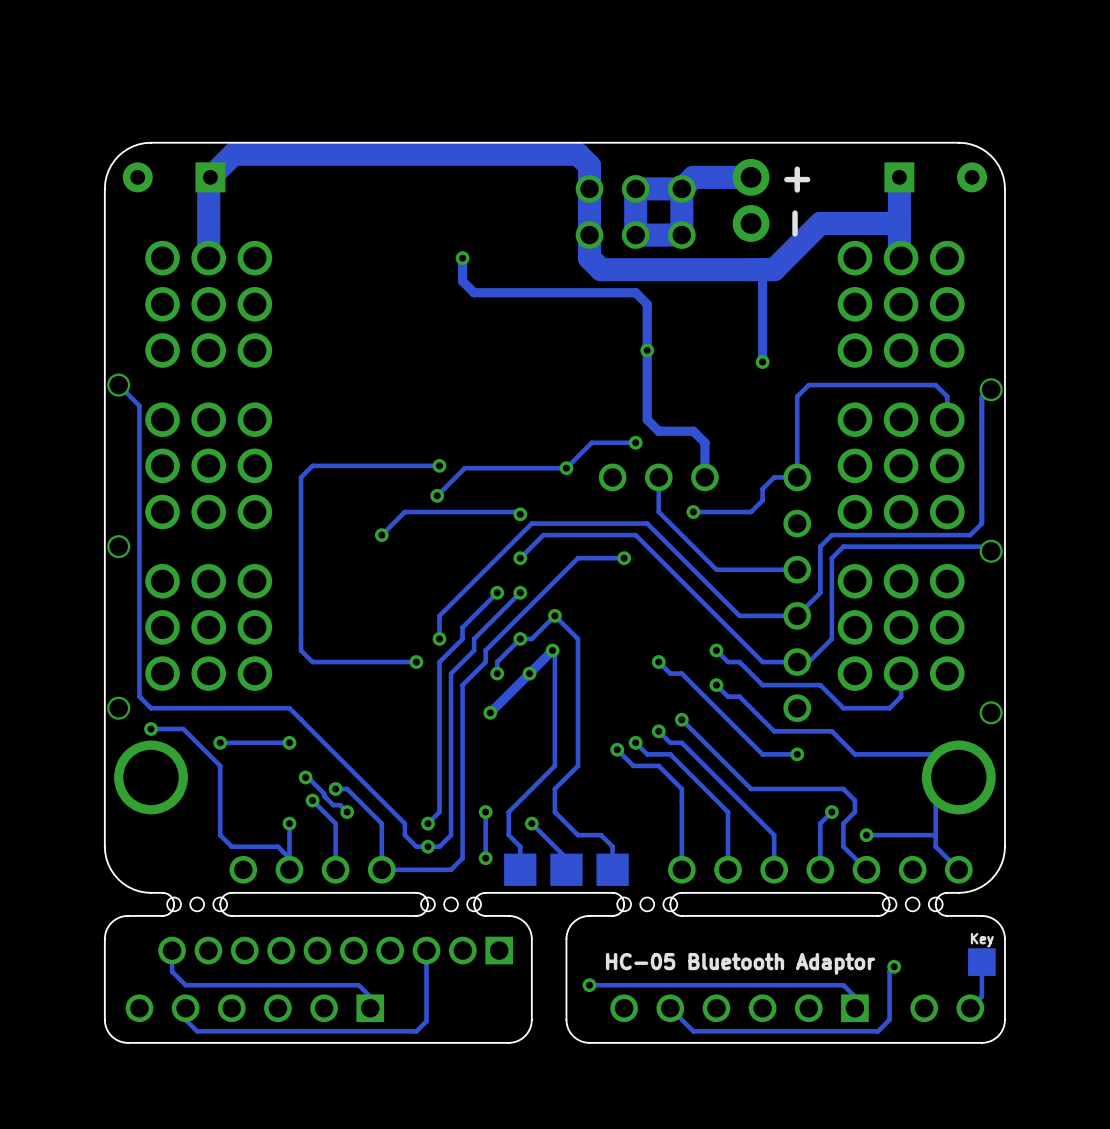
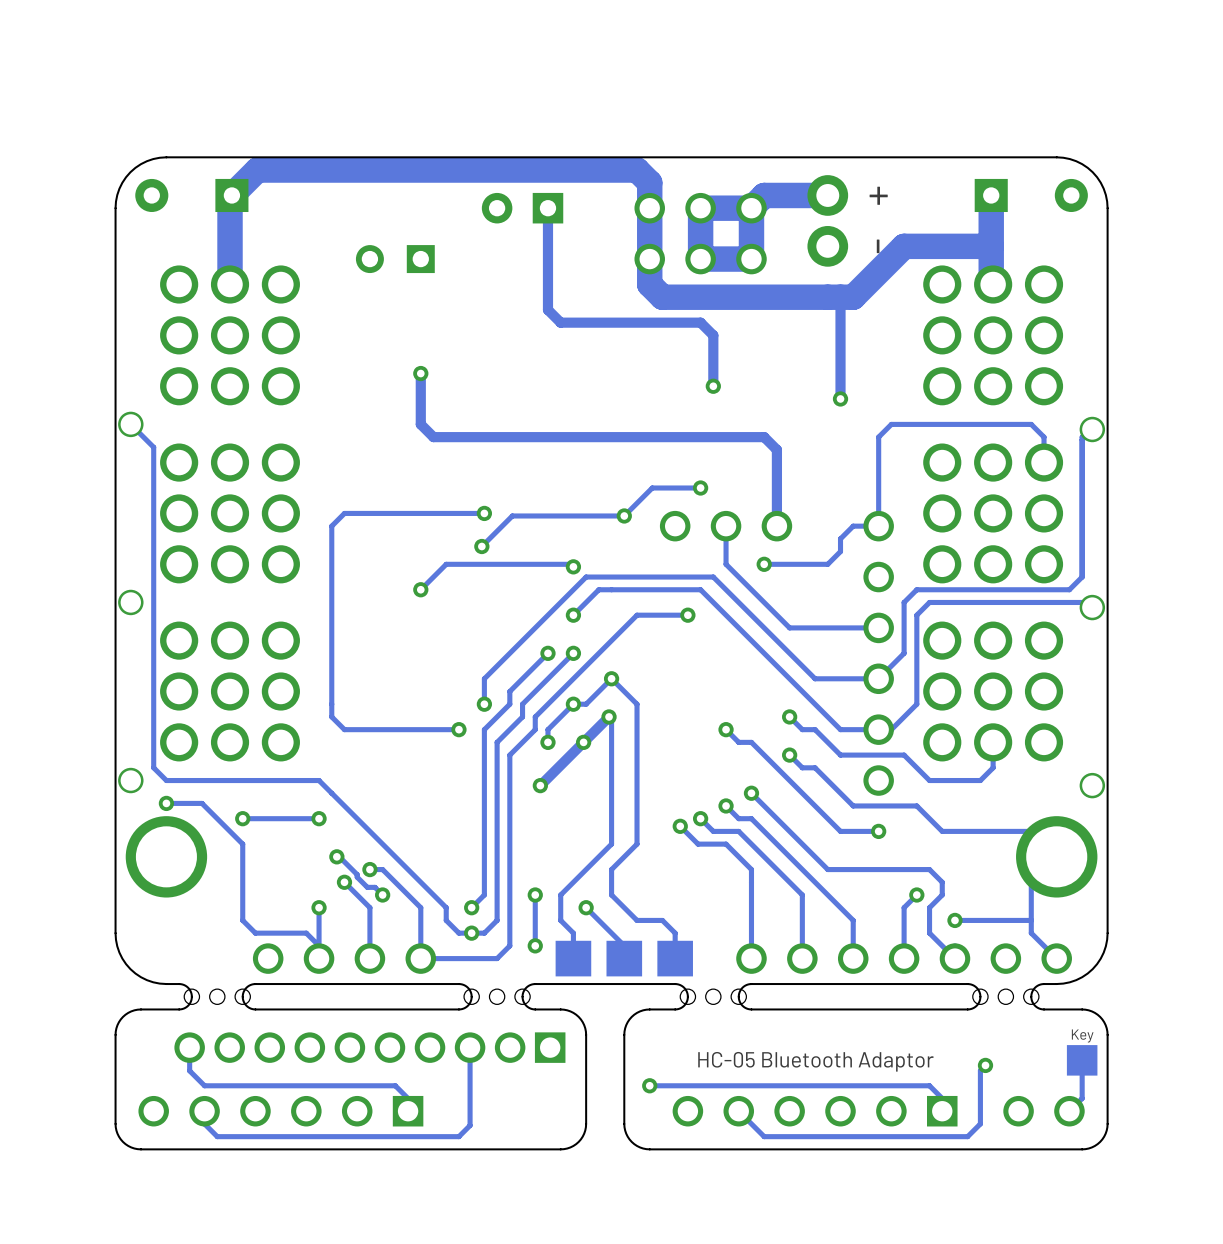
part: none -> (522, 208)
part: none -> (395, 259)
track: (462, 258) (462, 281) (474, 292) (508, 292) -> (547, 208) (547, 309) (560, 322)
via: (462, 258) -> none
via: none -> (420, 373)
track: (647, 350) (647, 419) (658, 431) (693, 431) (704, 442) -> (420, 373) (420, 424) (433, 437) (764, 437) (776, 449) (776, 488)

